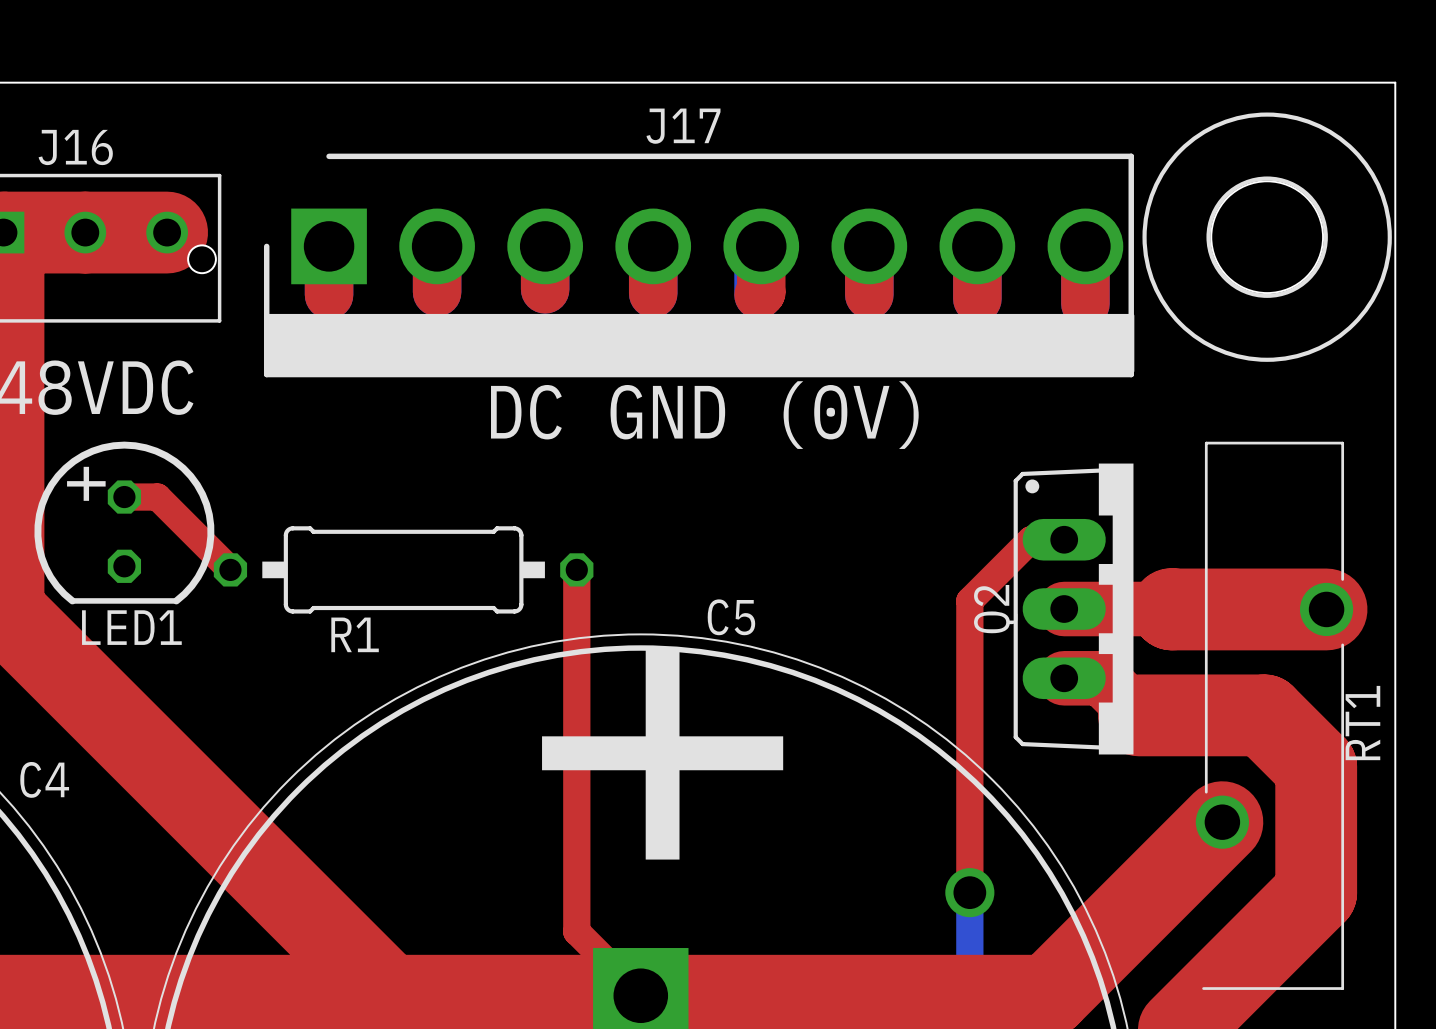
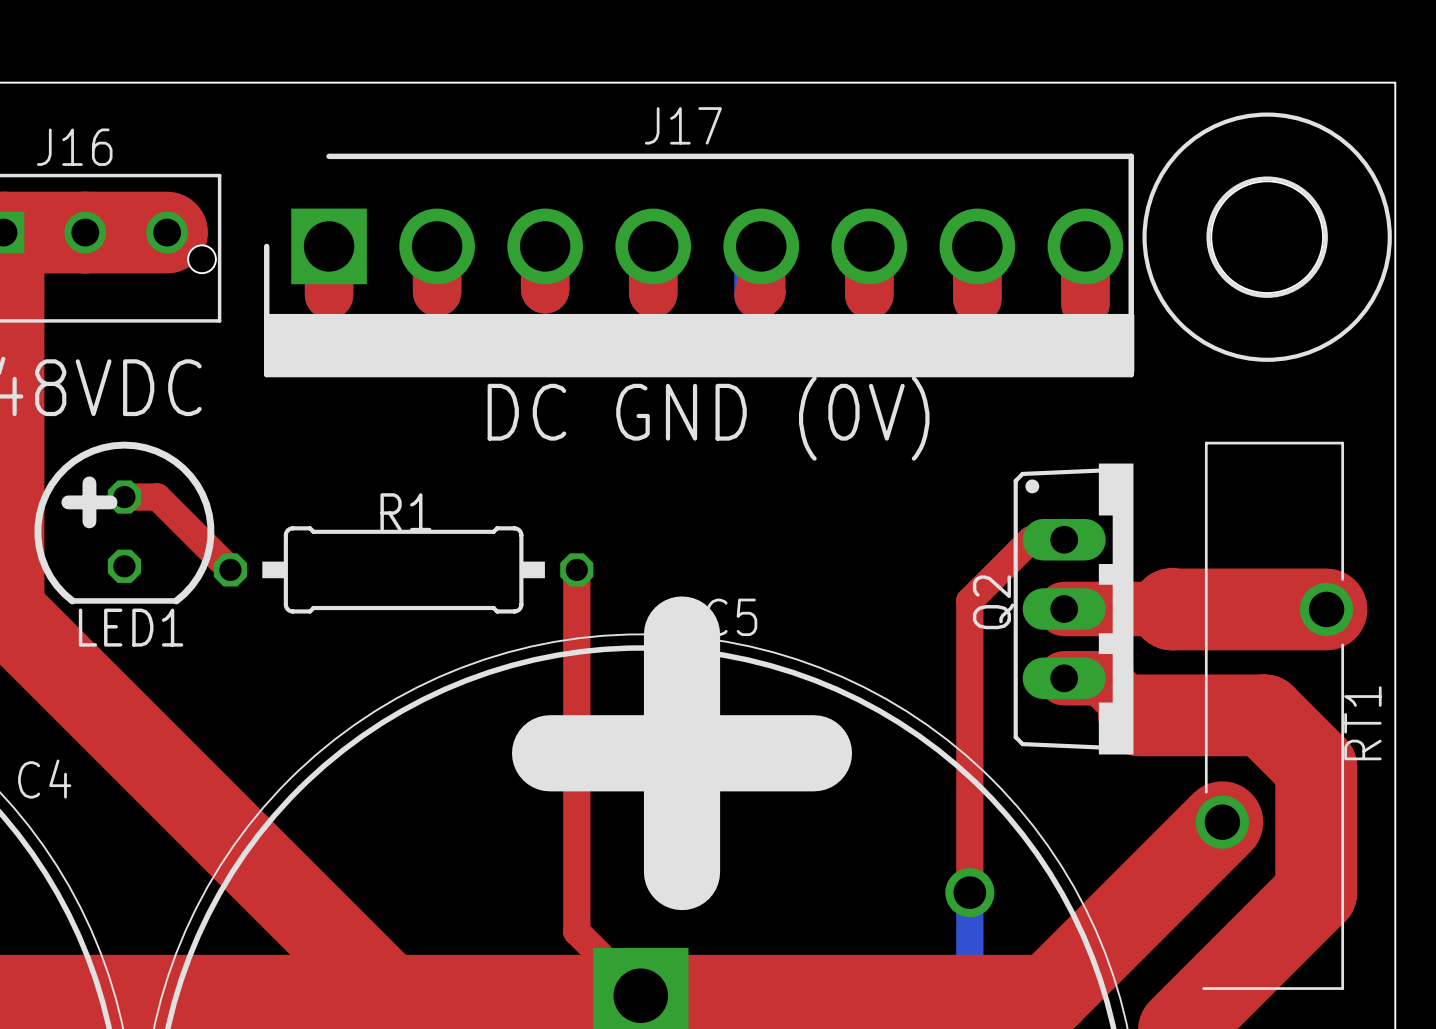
R1 name position: R1 (355, 634) -> R1 (405, 512)

